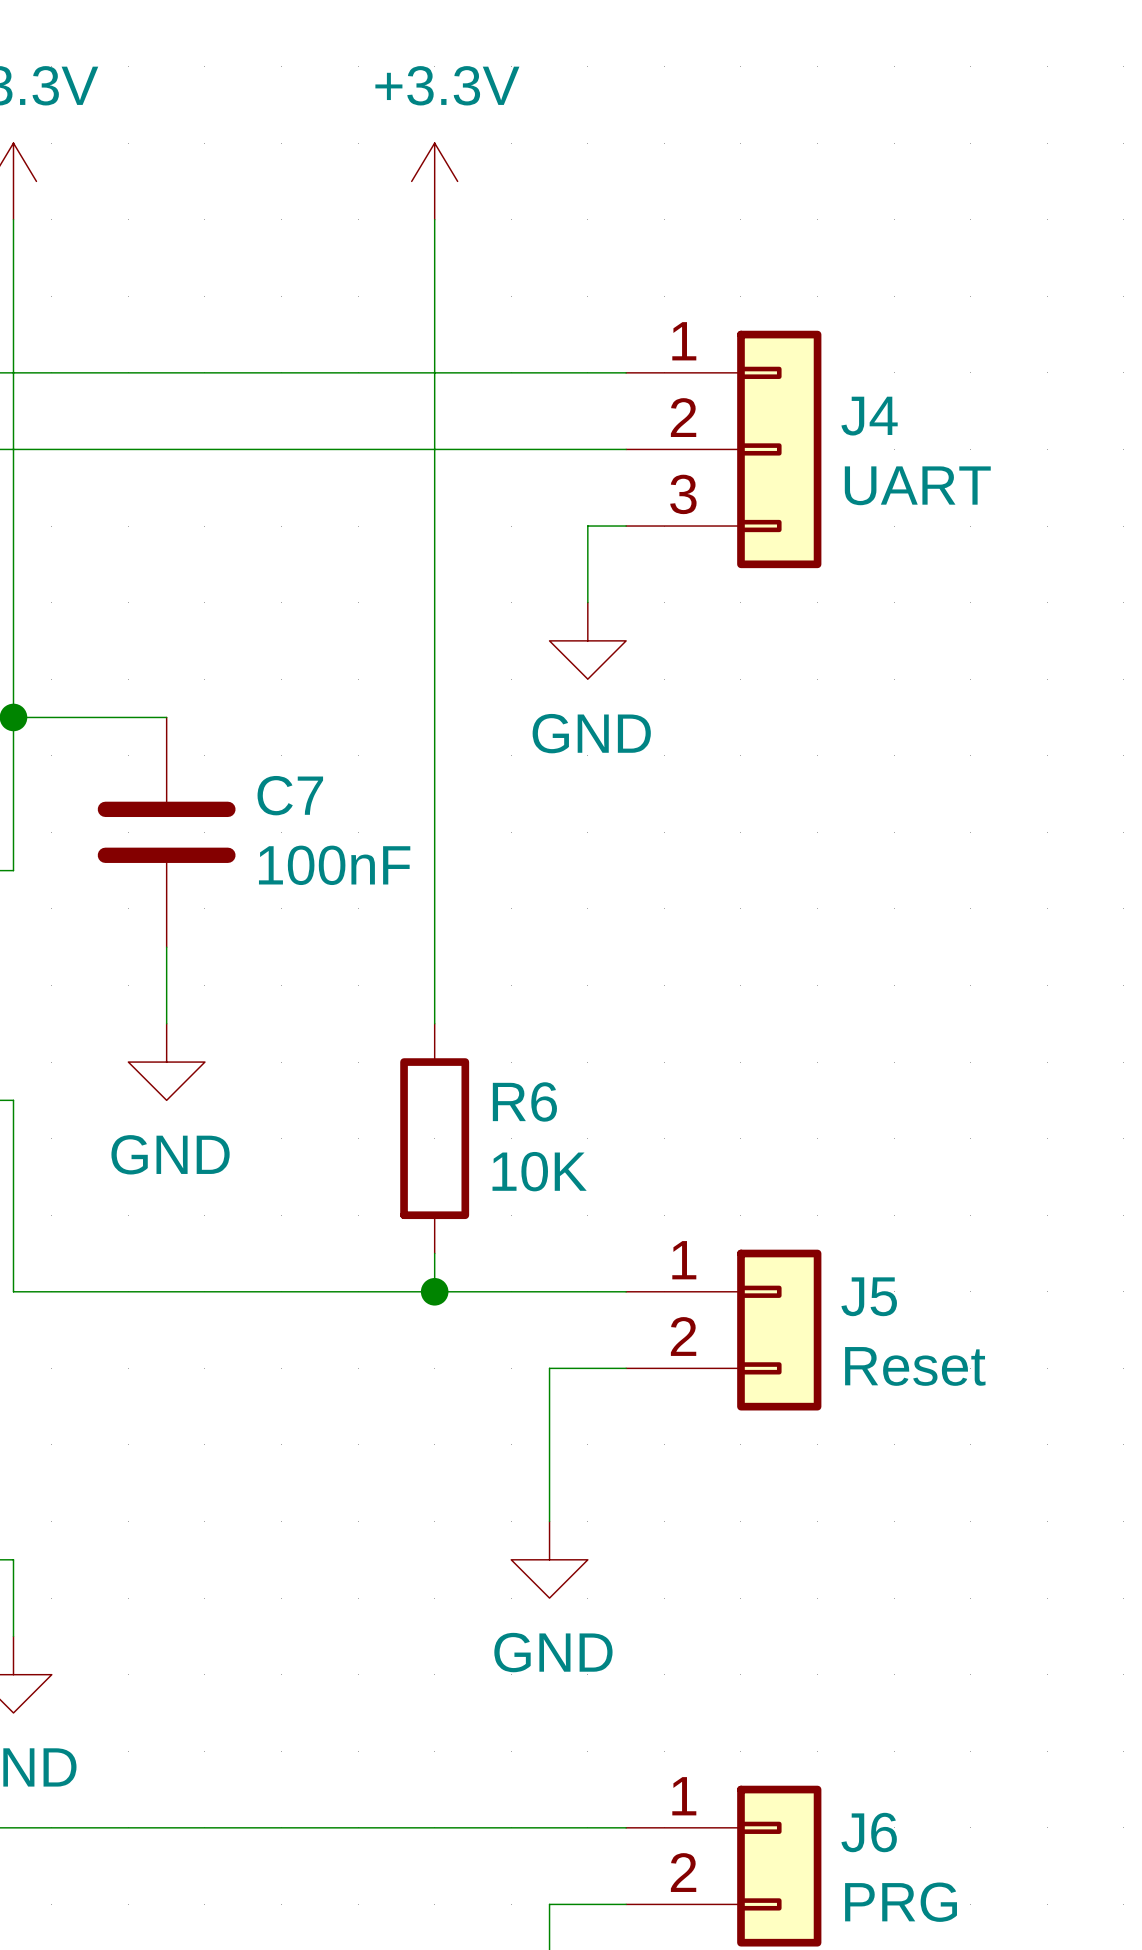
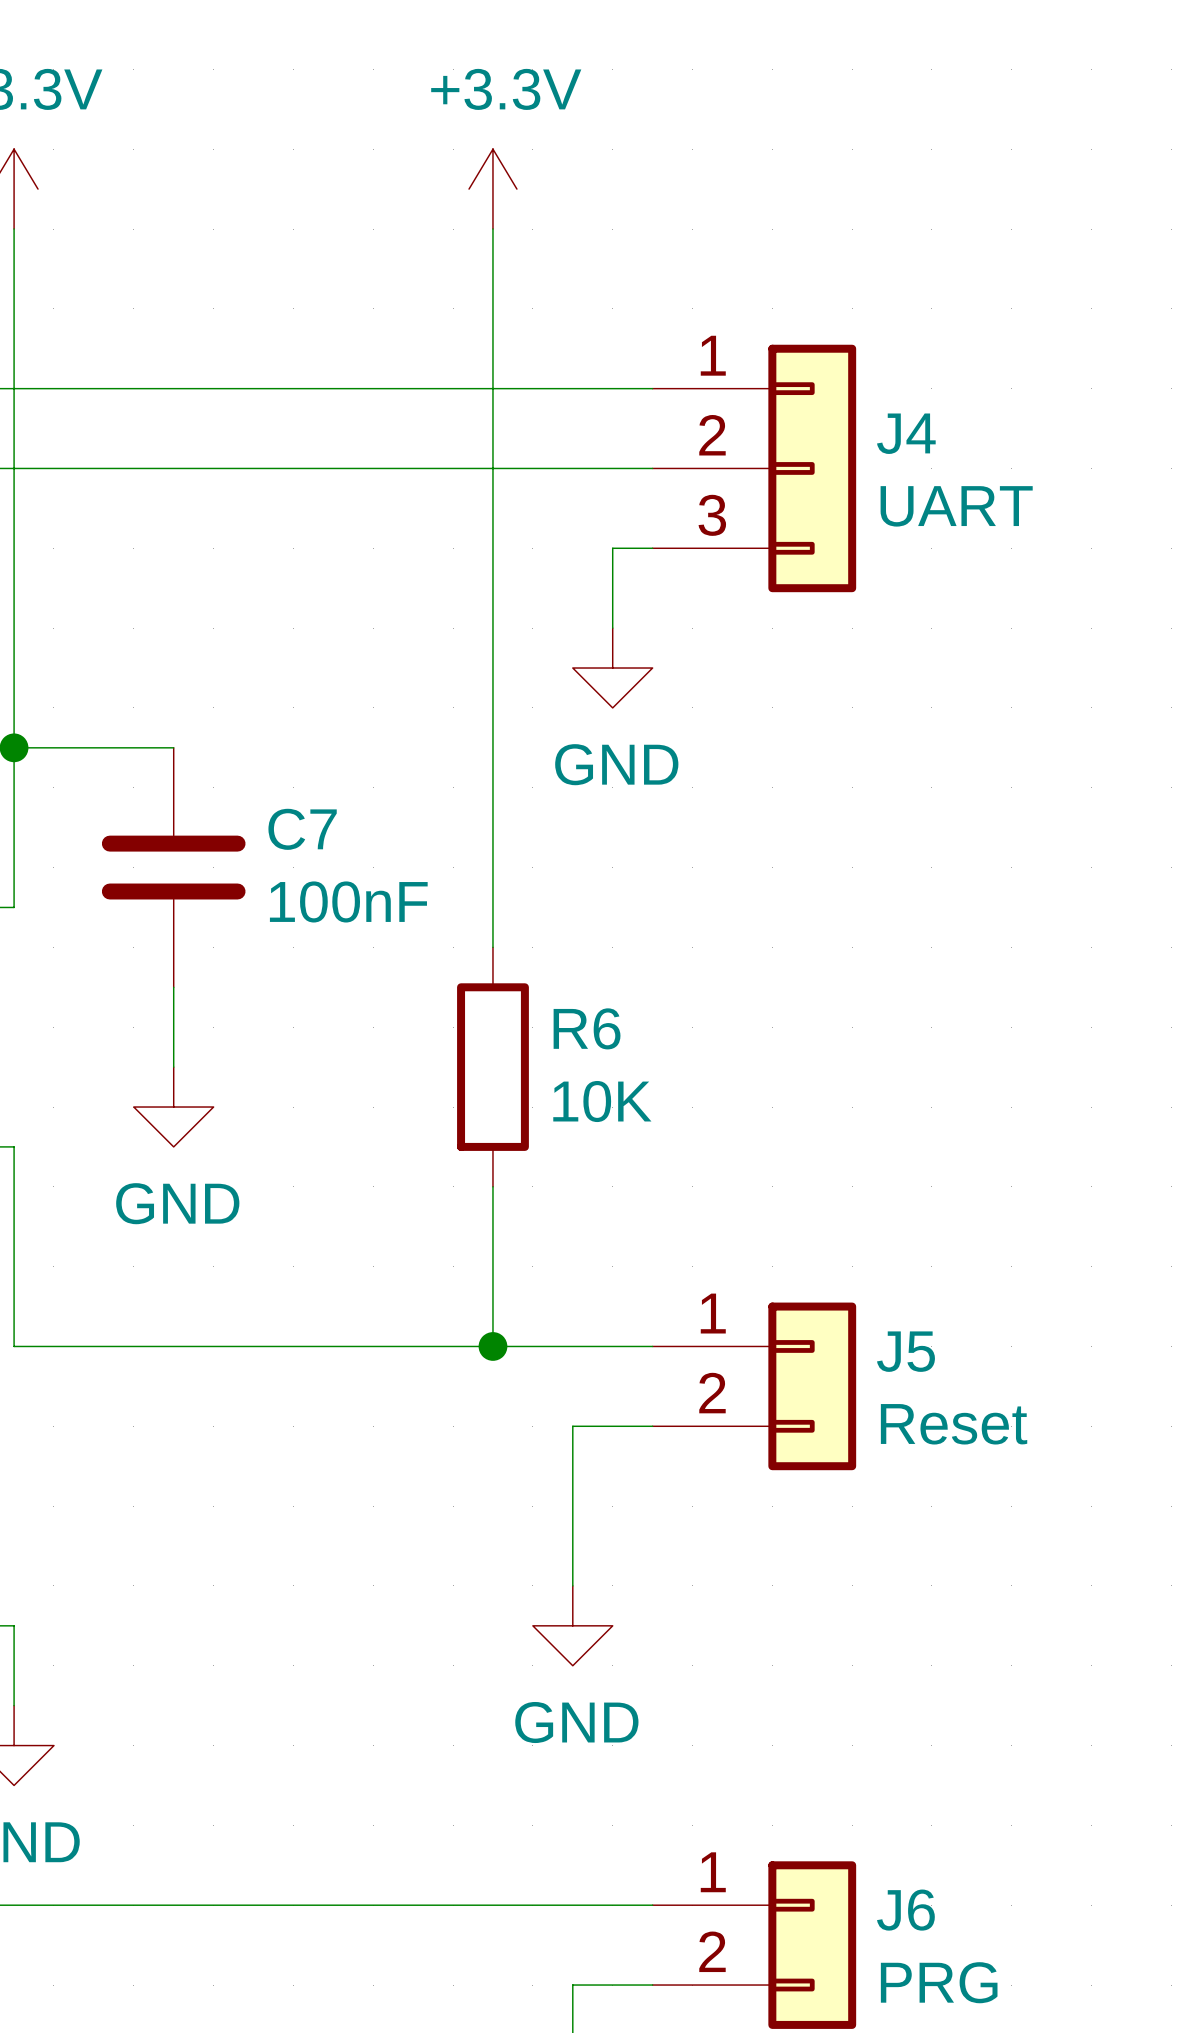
power symbol position: +3.3V (434, 181) -> +3.3V (492, 189)
wire: (434, 219) (434, 1023) -> none
wire: none -> (492, 229) (492, 947)
R6 position: (434, 1138) -> (492, 1067)
wire: none -> (492, 1186) (492, 1346)
wire: (434, 1253) (434, 1291) -> none
junction position: (434, 1291) -> (492, 1346)

